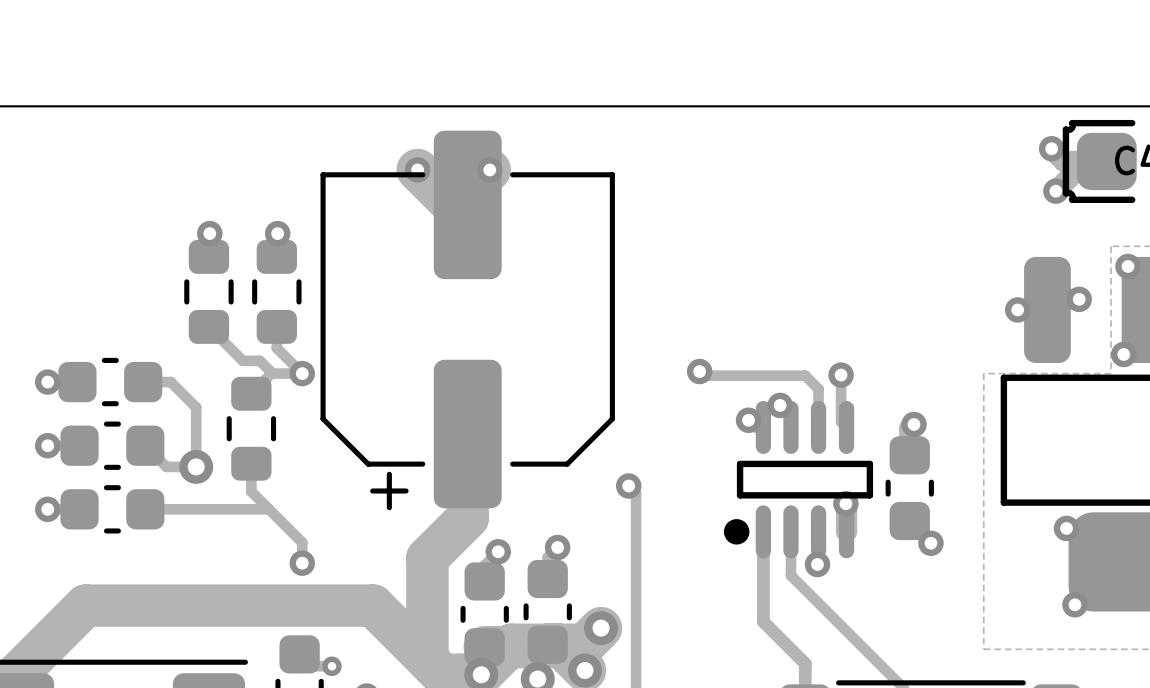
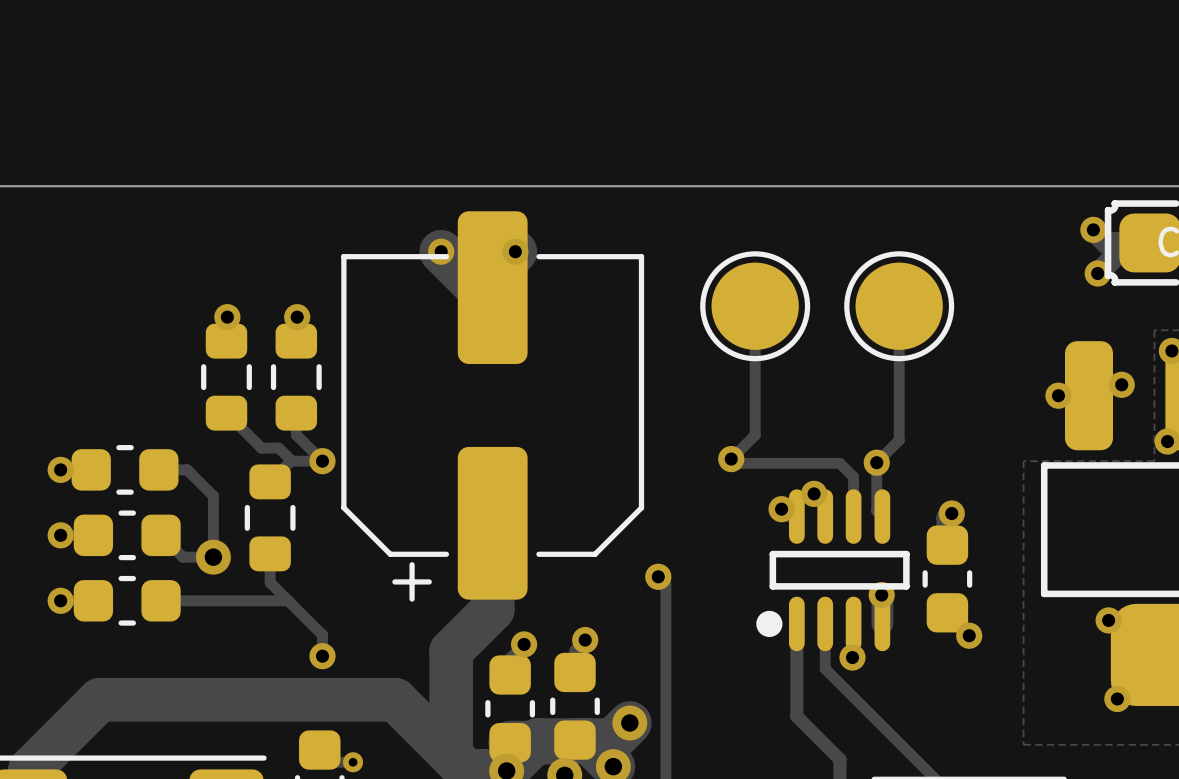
track: none -> (755, 306) (755, 435) (731, 459)
part: none -> (755, 306)
track: none -> (899, 306) (899, 440) (876, 462)
part: none -> (899, 306)

